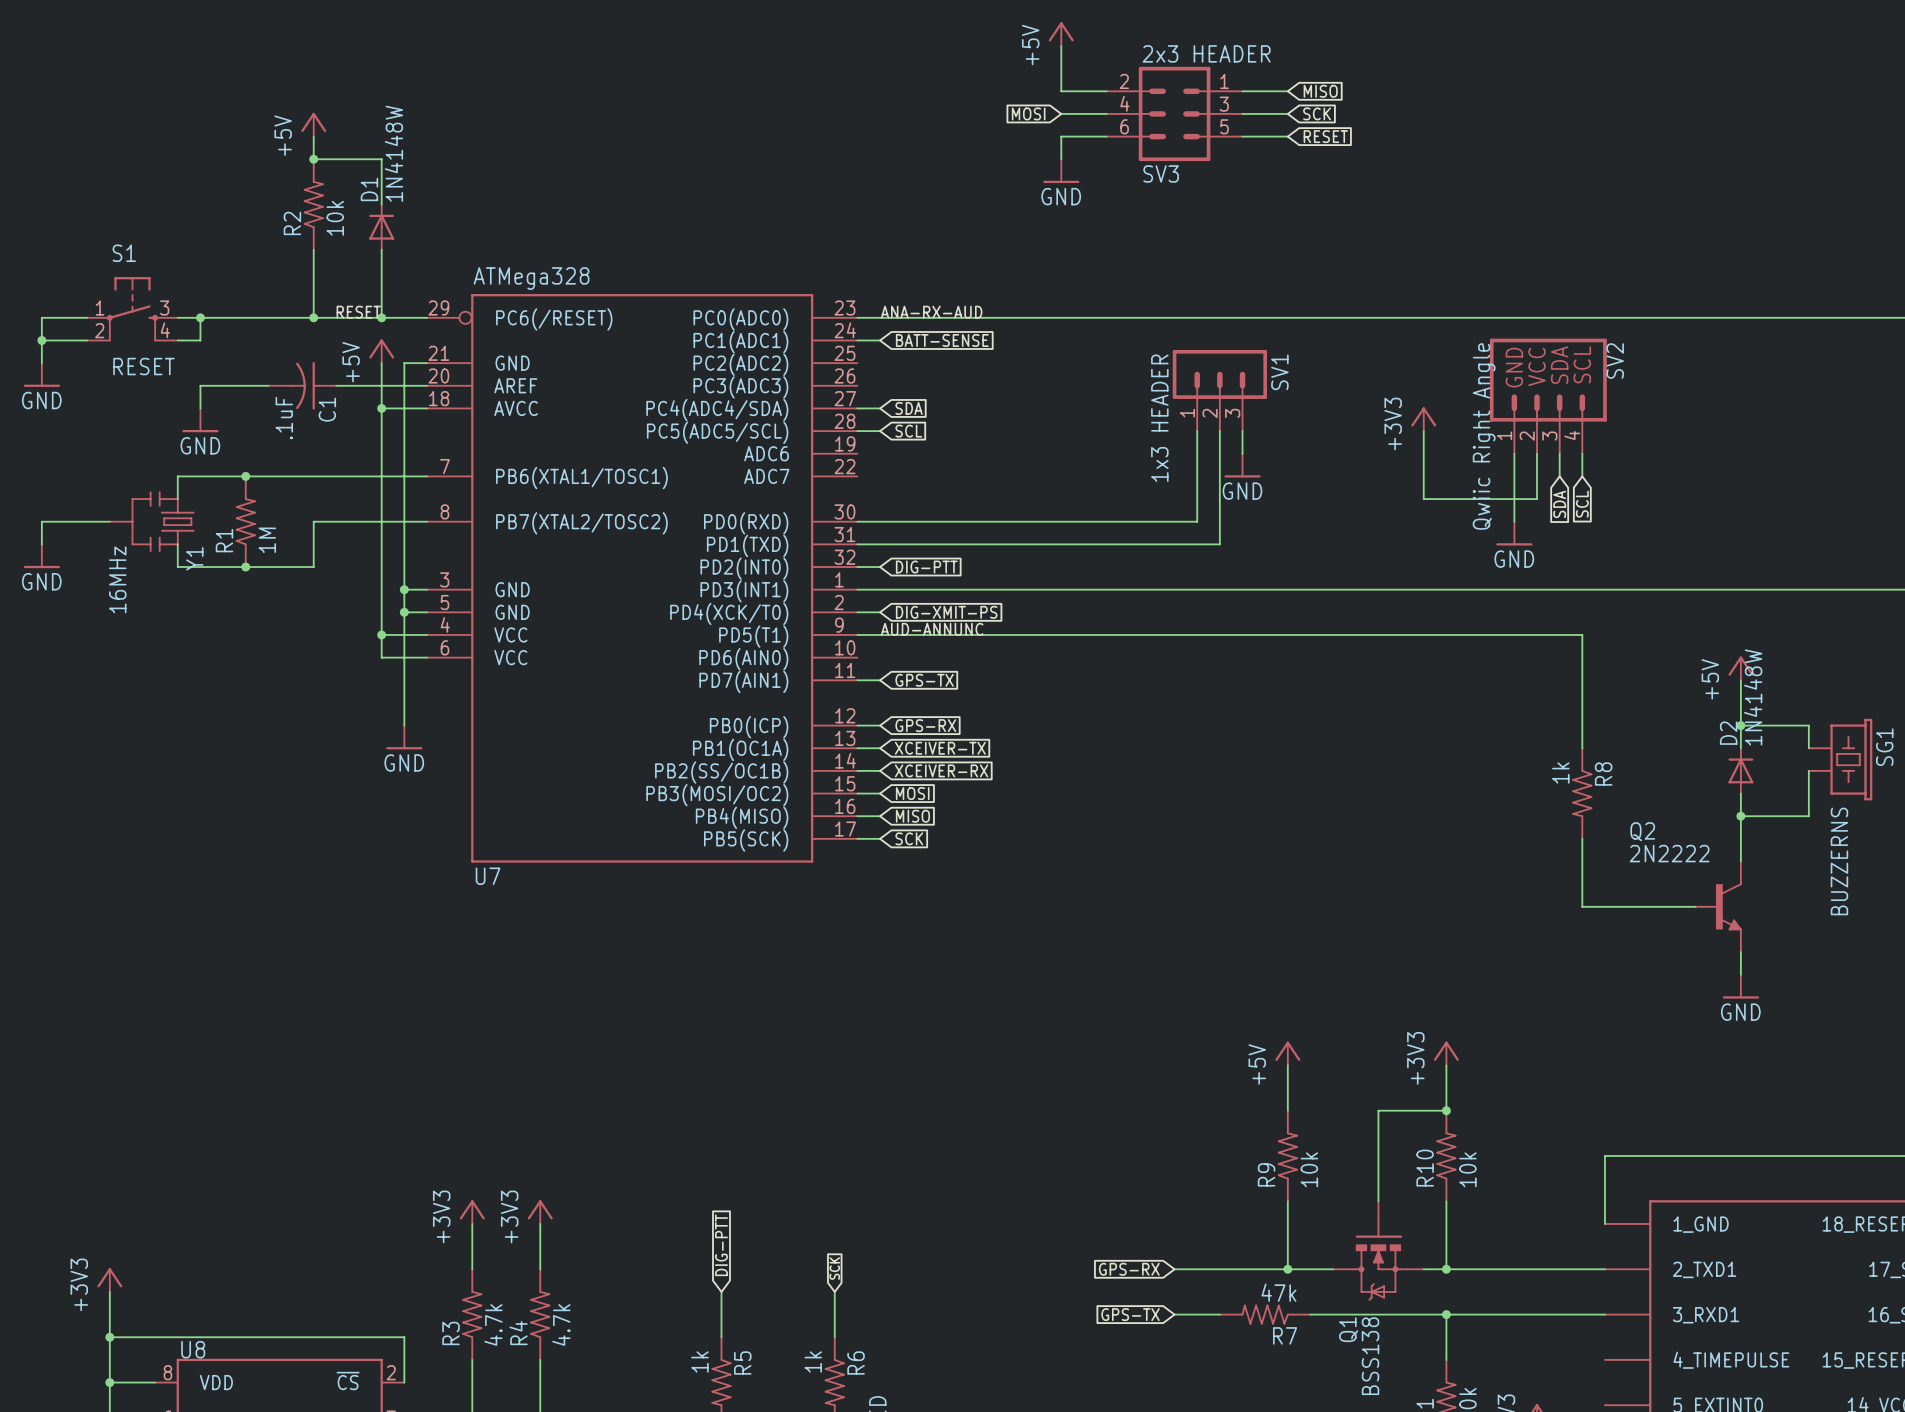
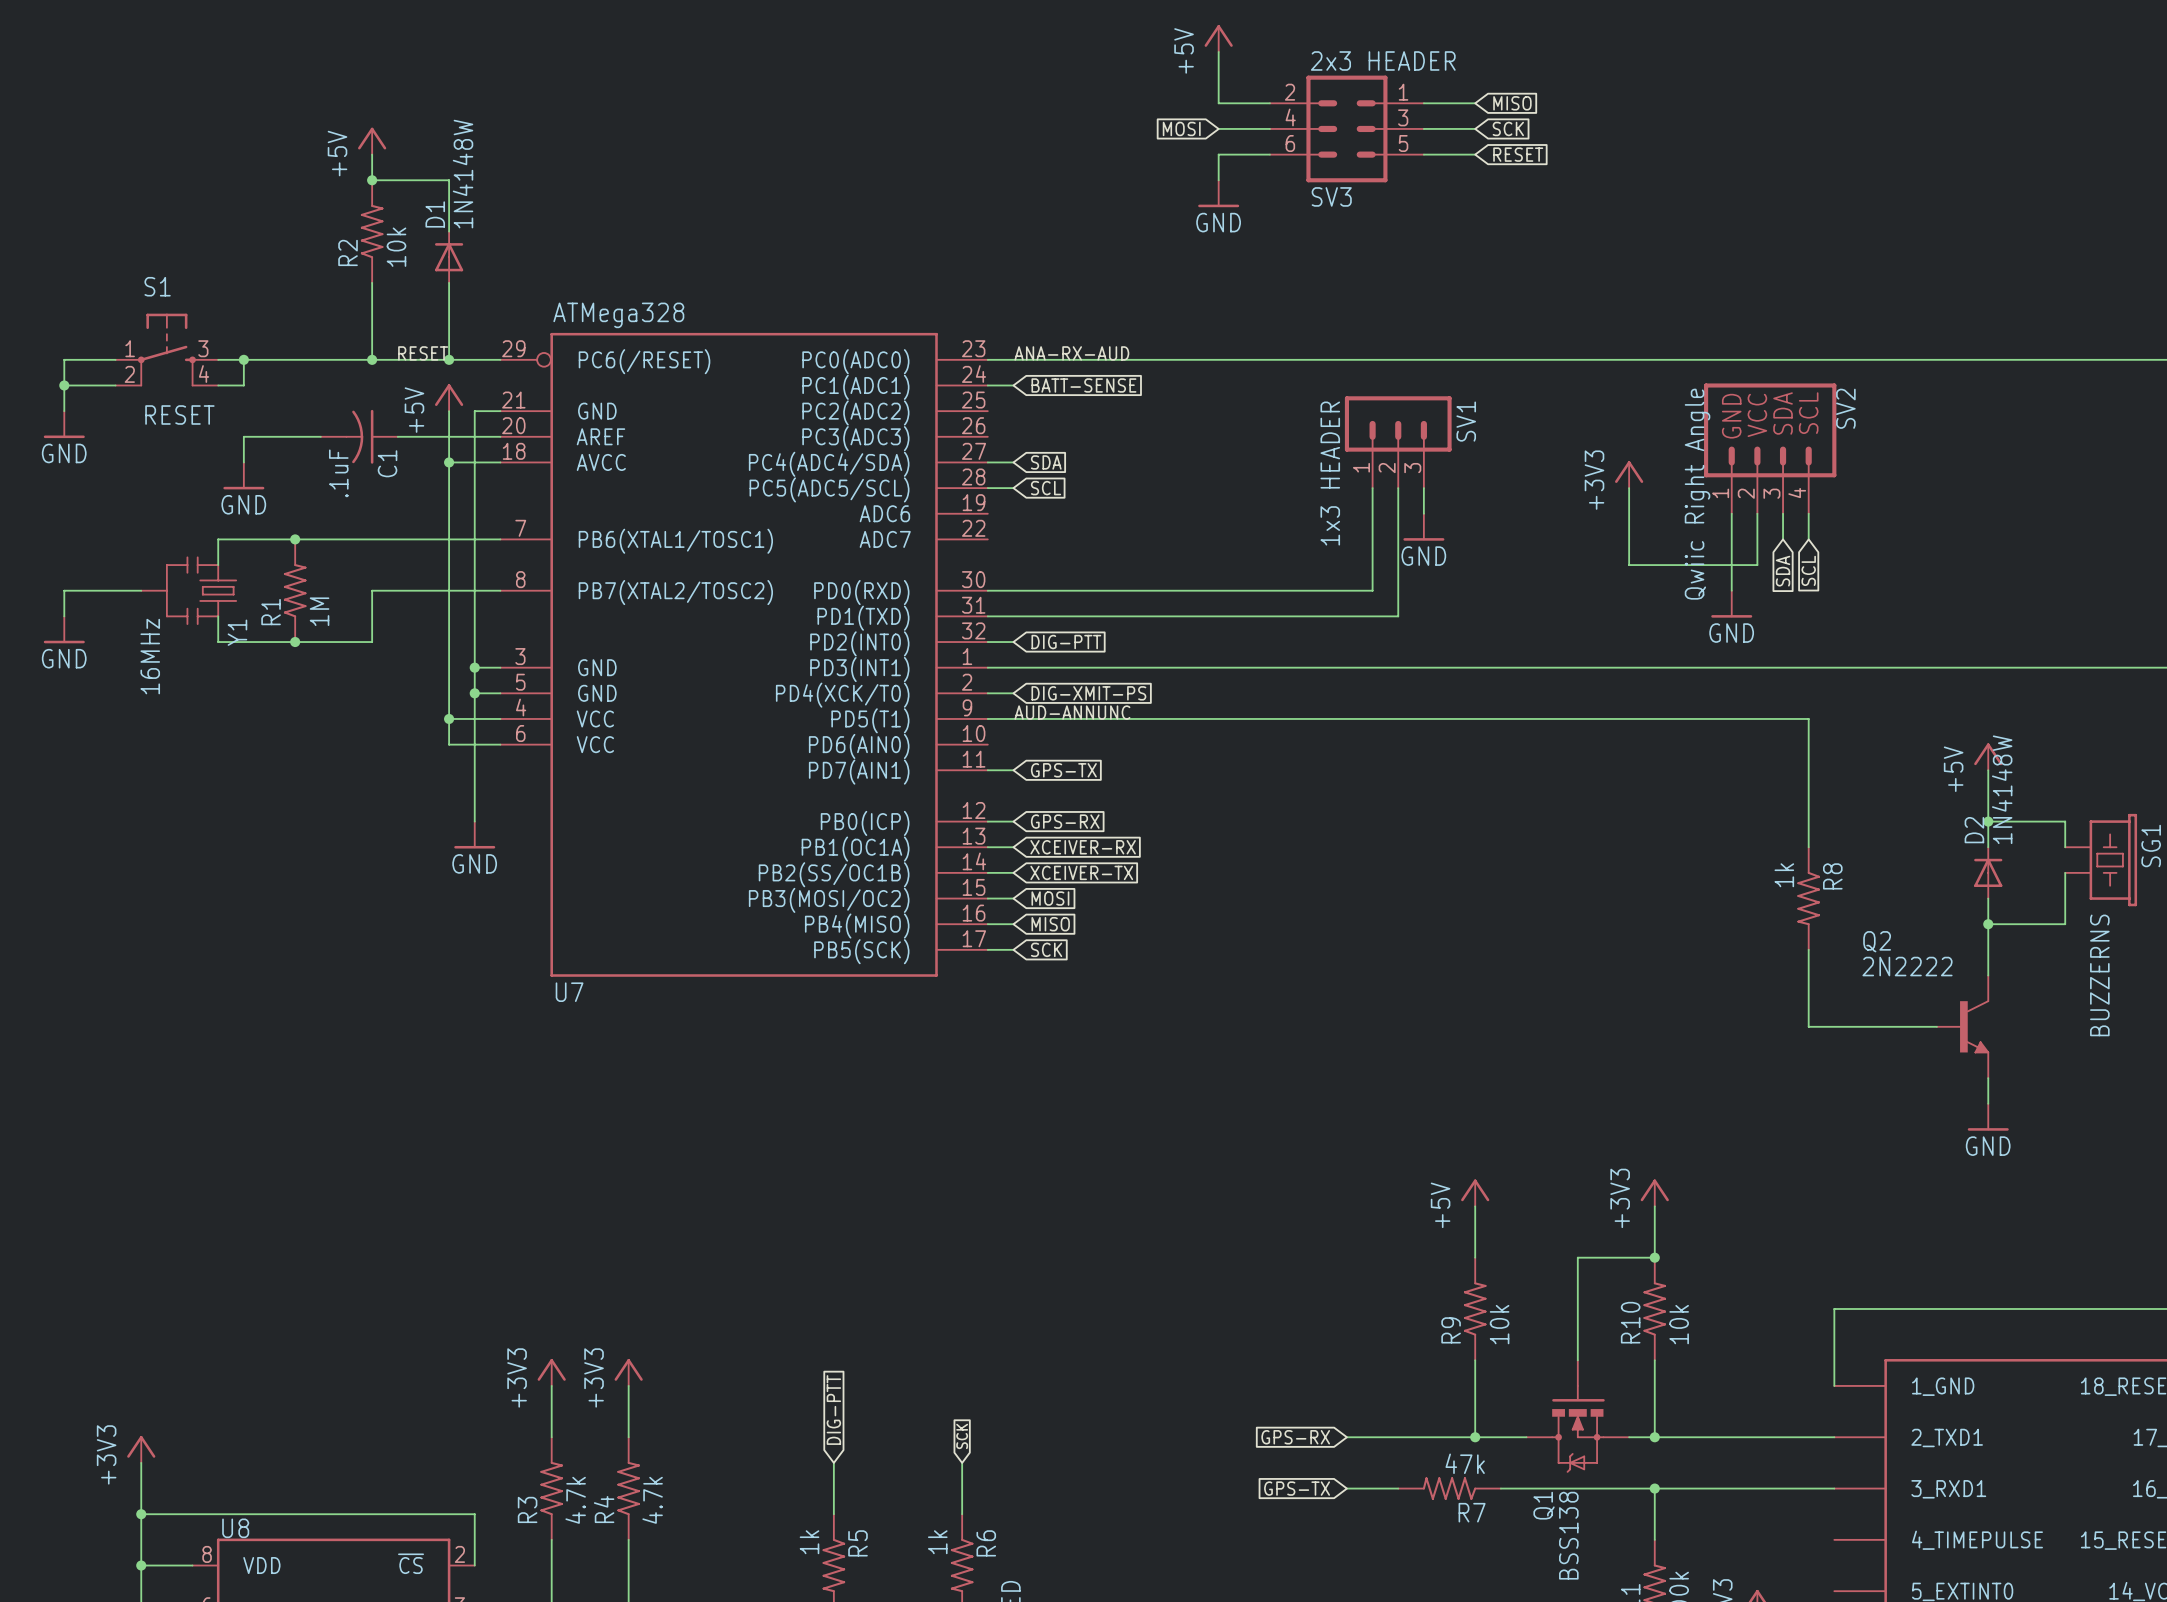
global label: XCEIVER-TX (940, 748) -> XCEIVER-RX (1083, 847)
global label: XCEIVER-RX (941, 770) -> XCEIVER-TX (1081, 872)

